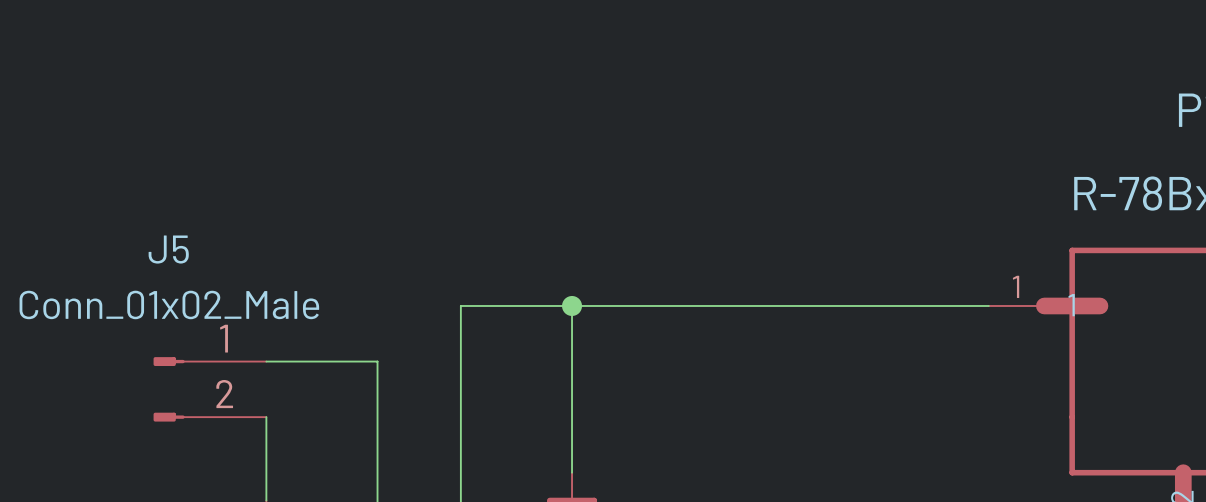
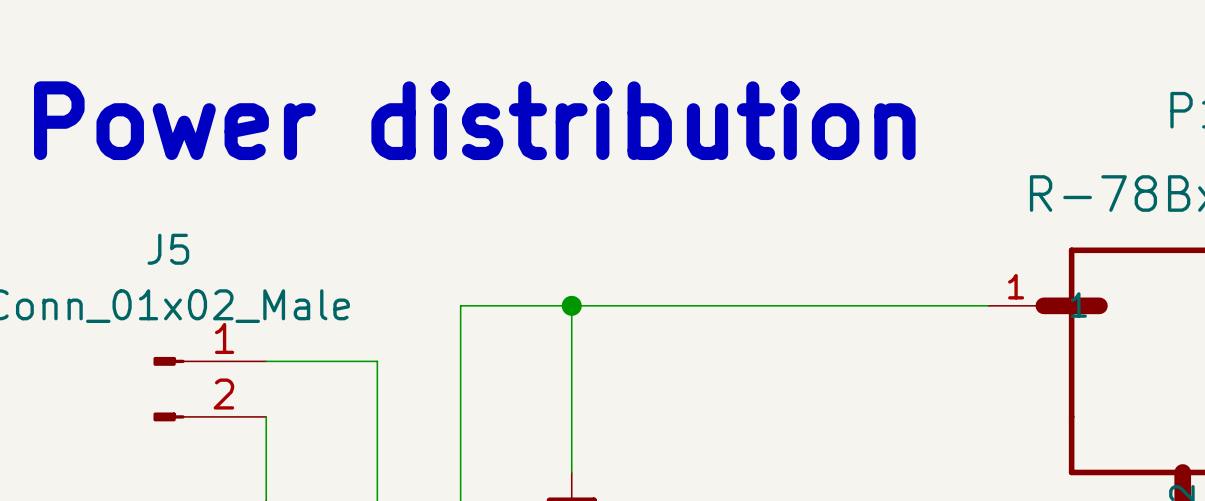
text: none -> Power distribution (474, 120)

